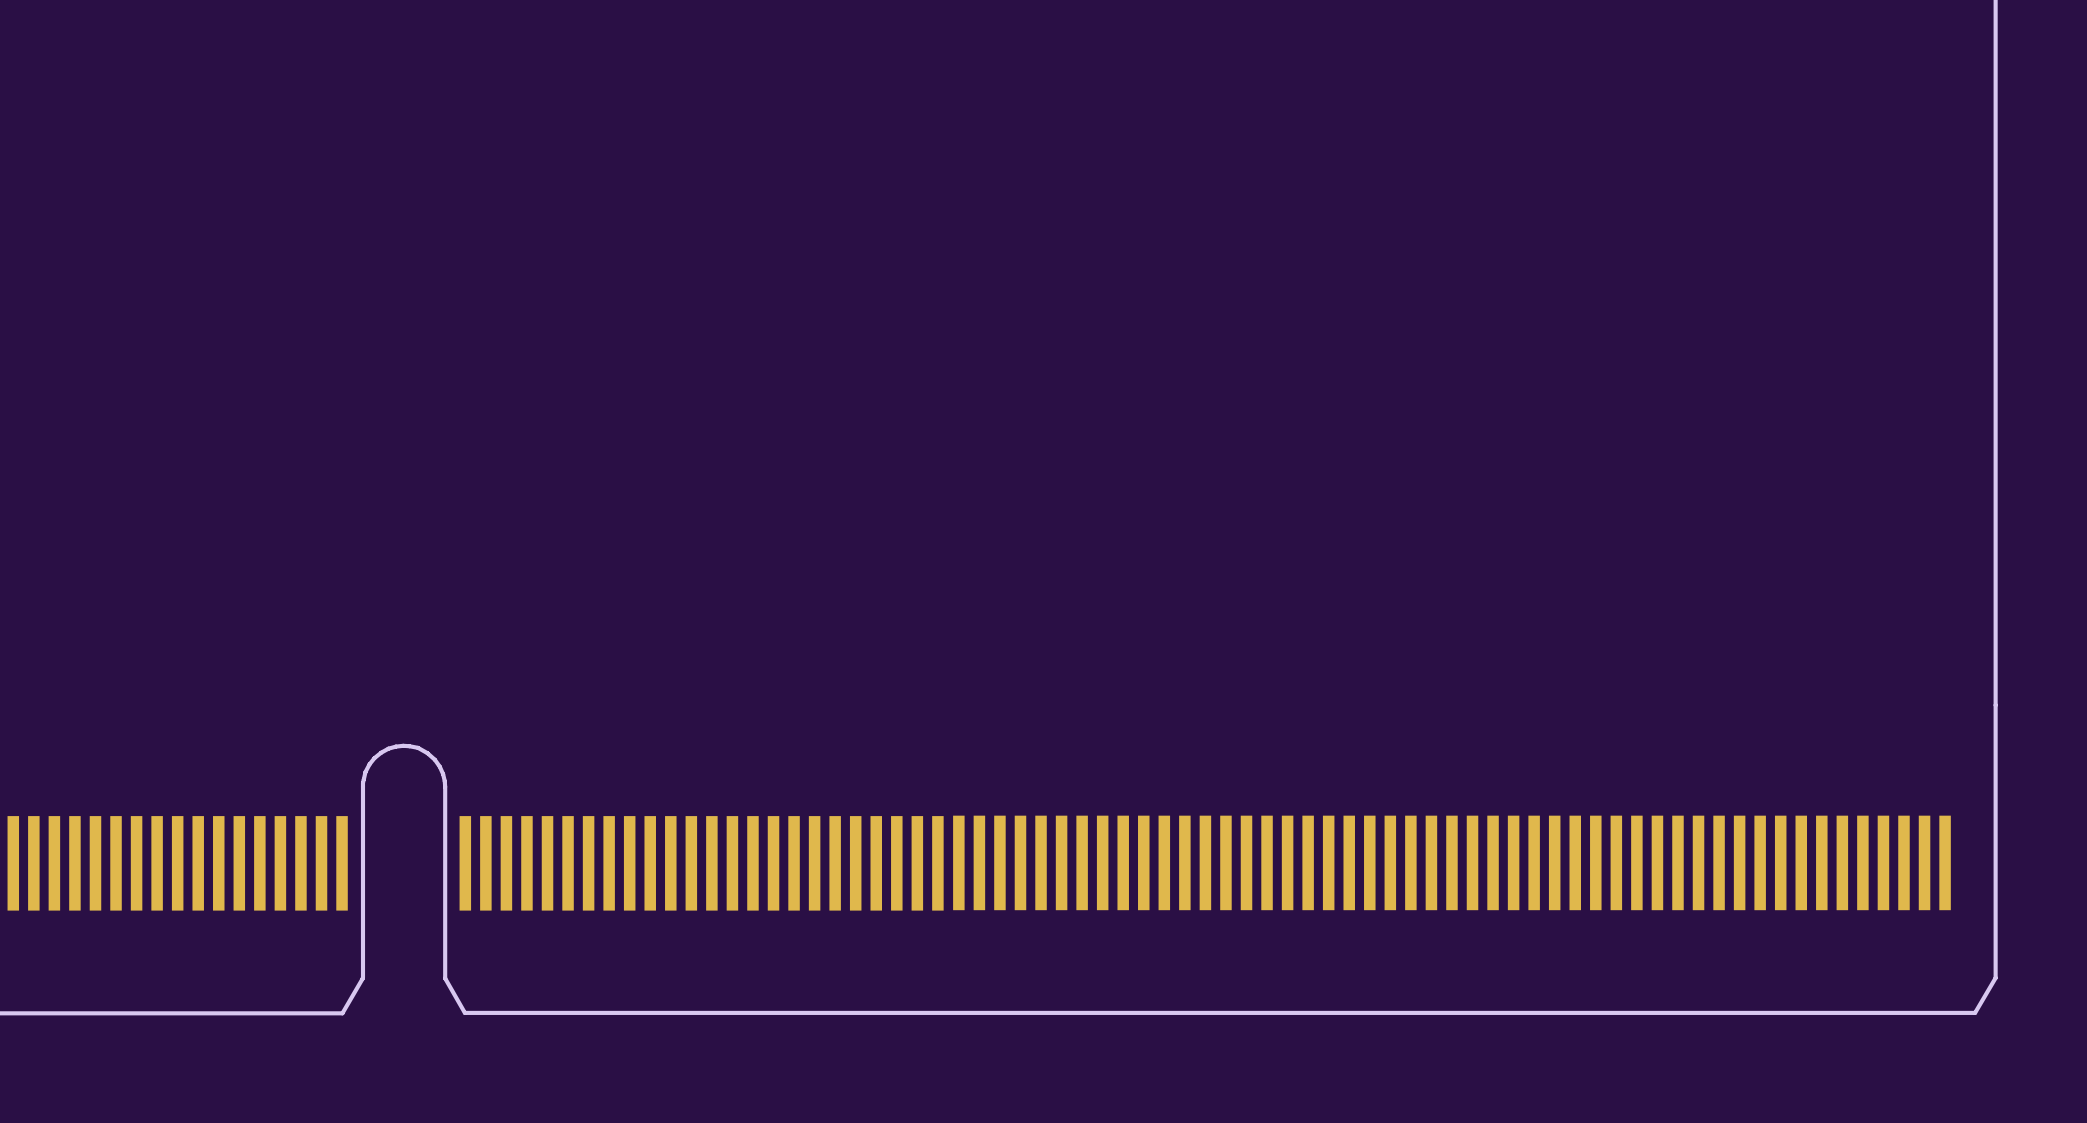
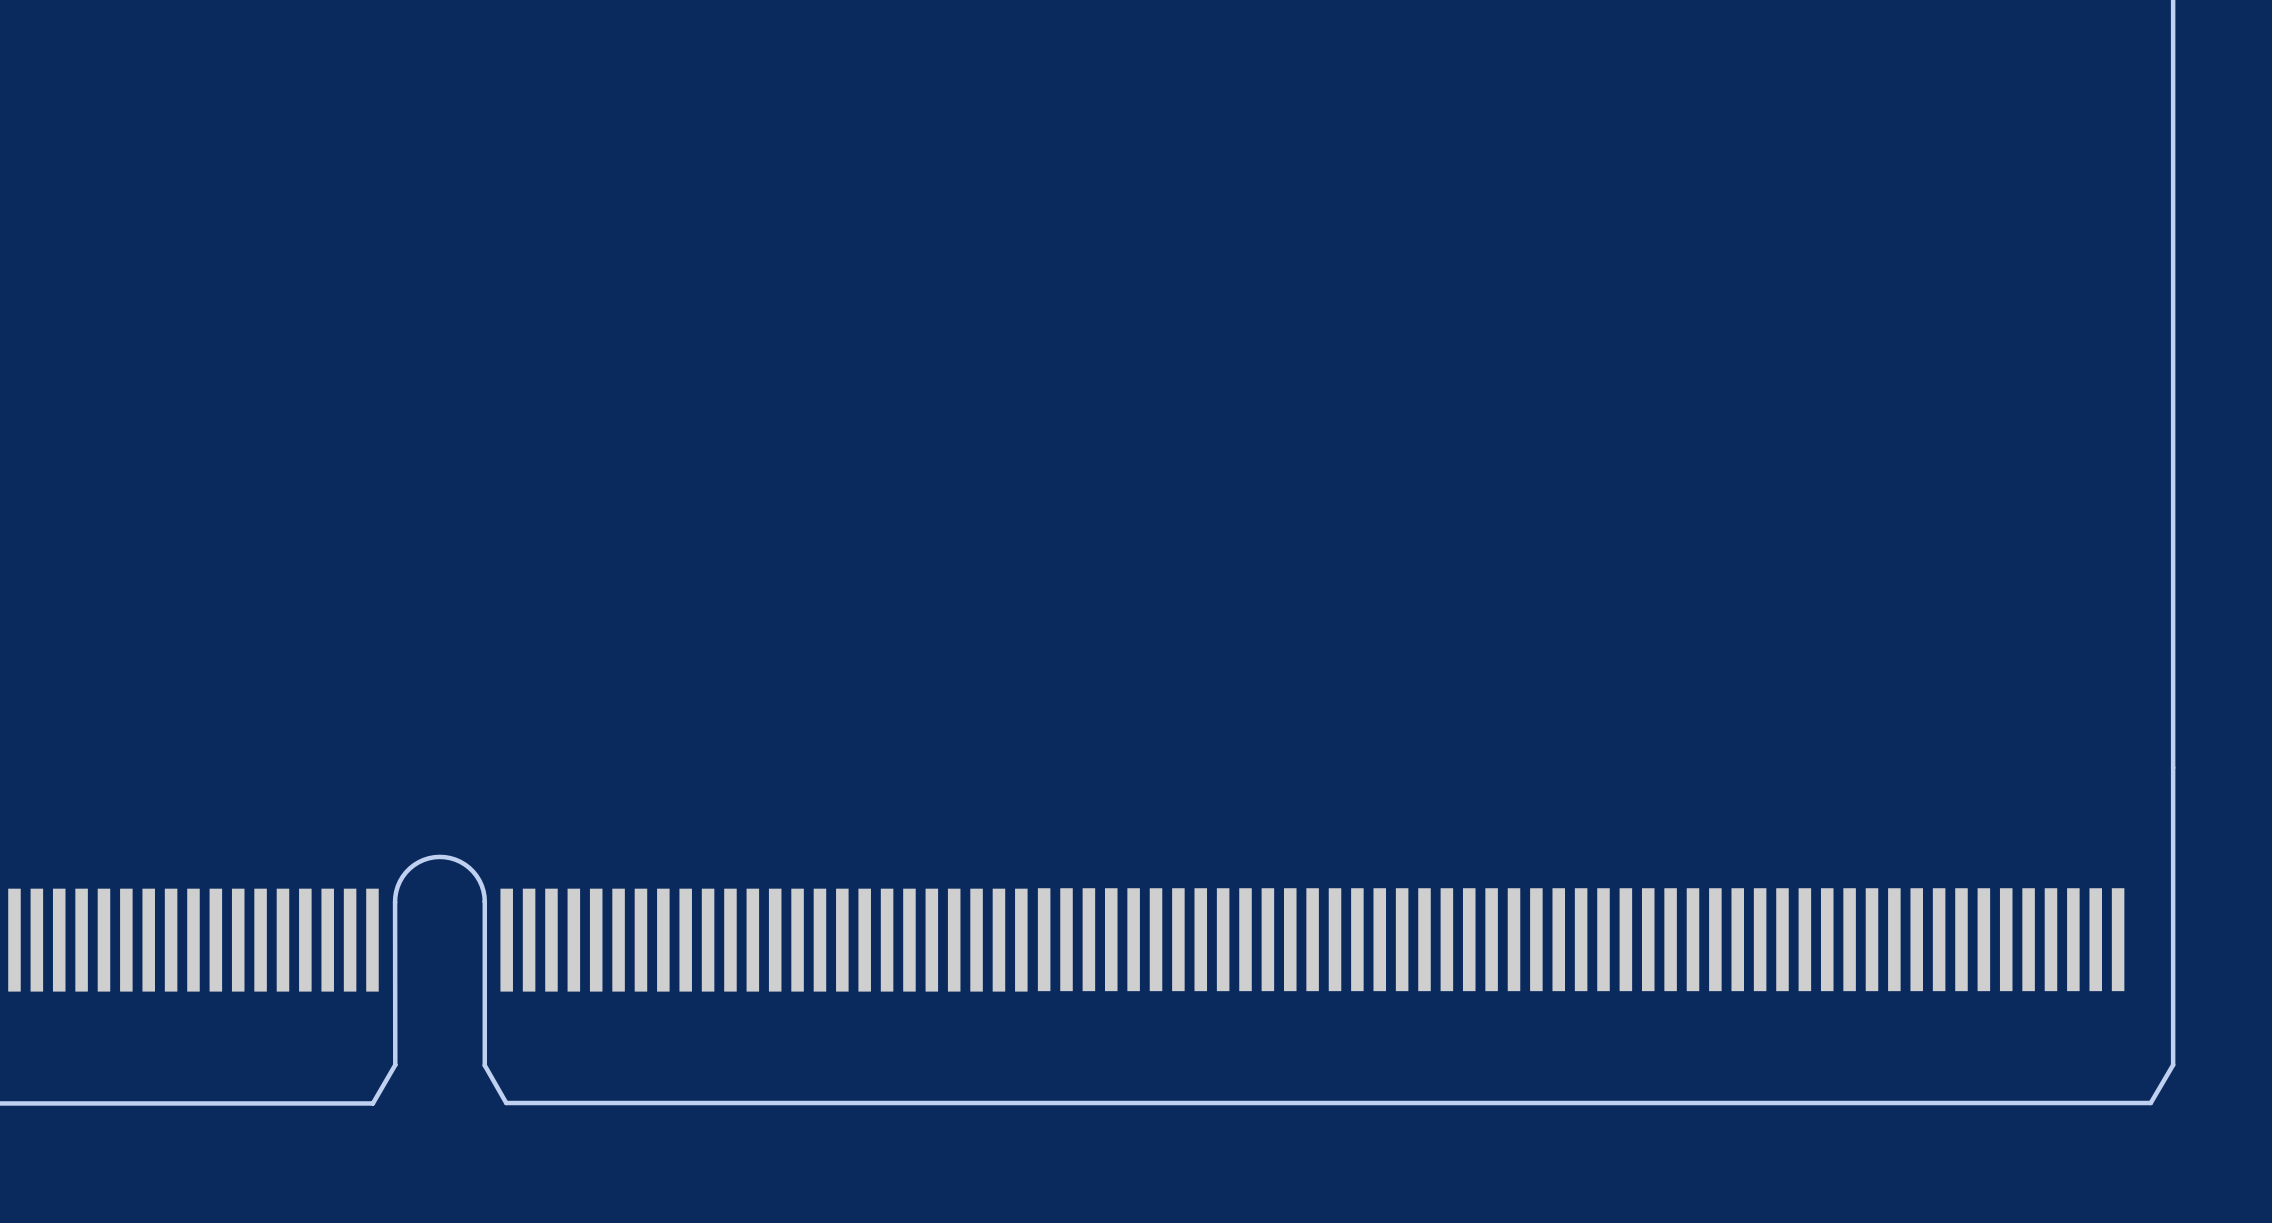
board edge: (445, 828) (444, 781) (439, 766) (434, 759) (418, 747) (403, 745) (388, 748) (374, 758) (365, 772) (362, 782) (362, 977) (342, 1013) -> (484, 901) (481, 885) (476, 876) (465, 864) (450, 858) (434, 857) (418, 862) (409, 868) (399, 881) (395, 902) (395, 1064) (372, 1103)

